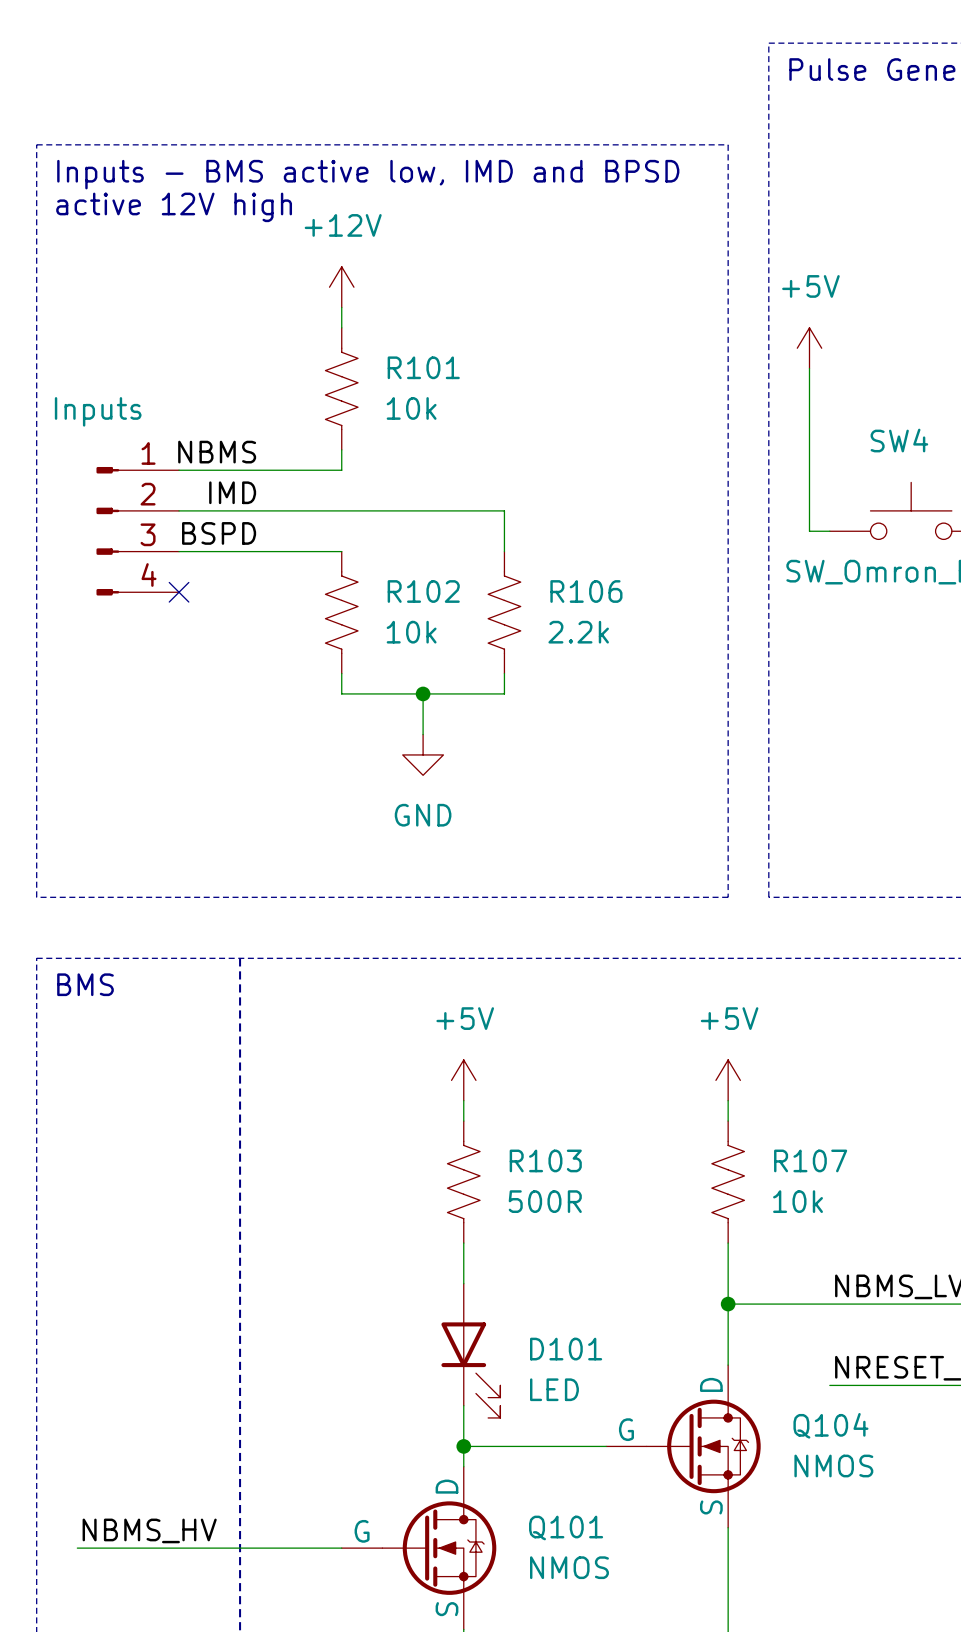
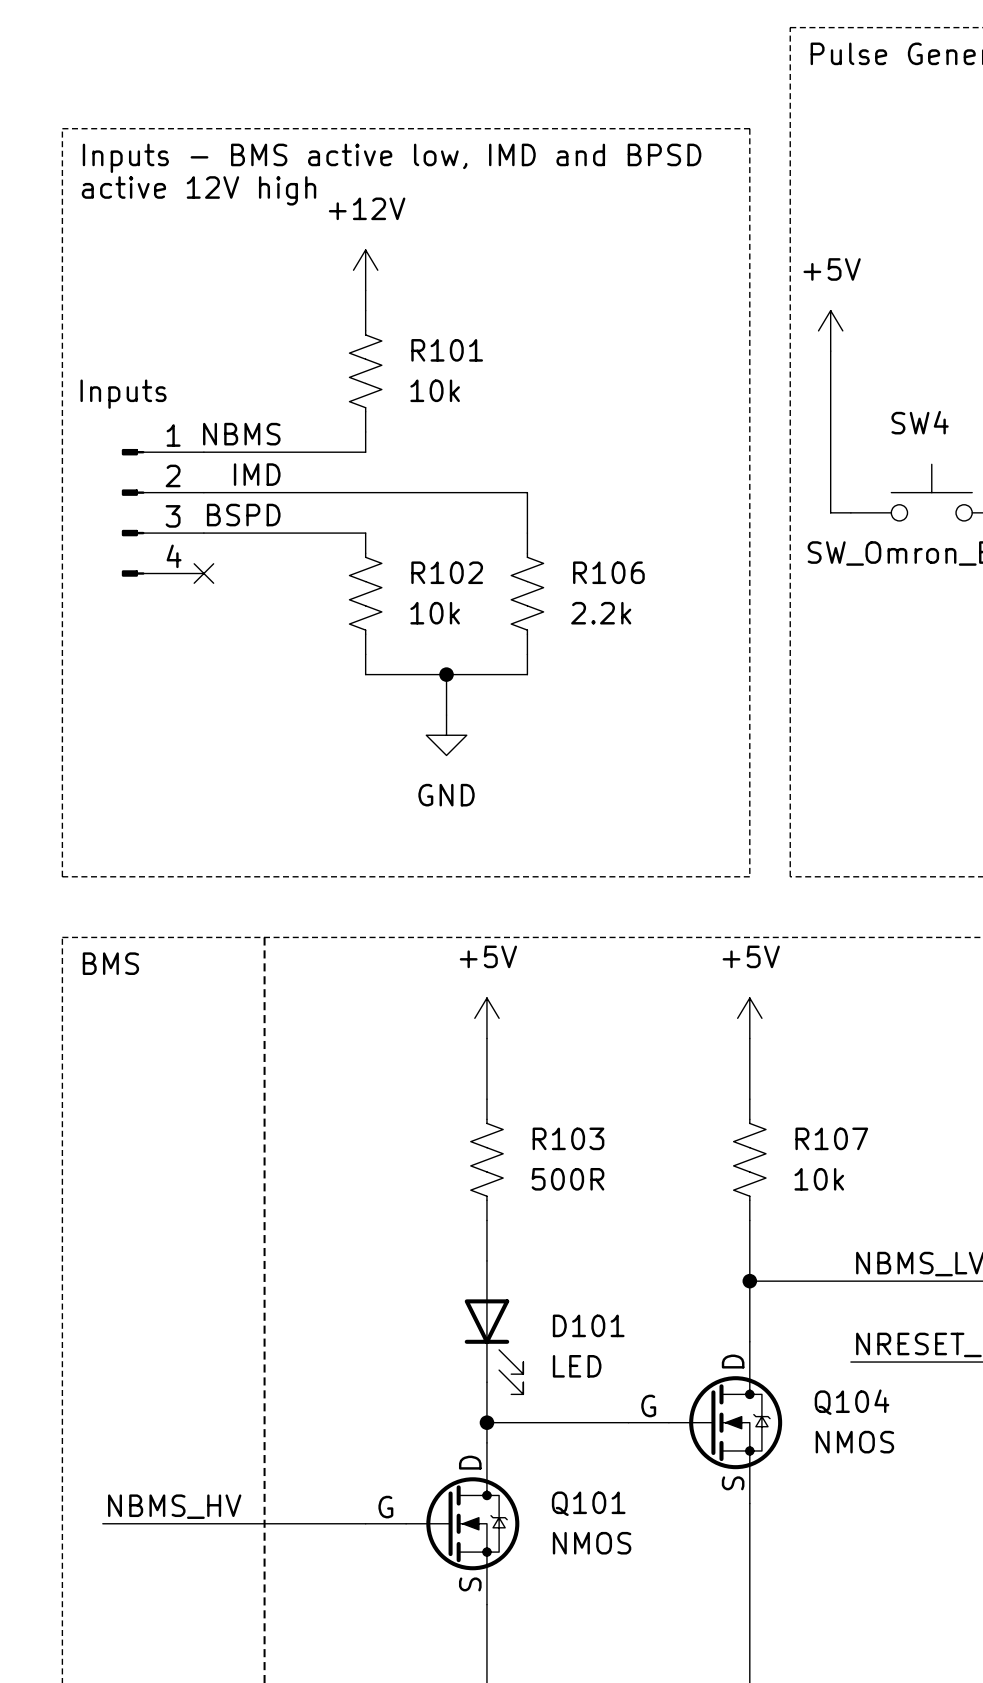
power symbol position: +5V (463, 1080) -> +5V (486, 1018)
power symbol position: +5V (728, 1080) -> +5V (749, 1018)

